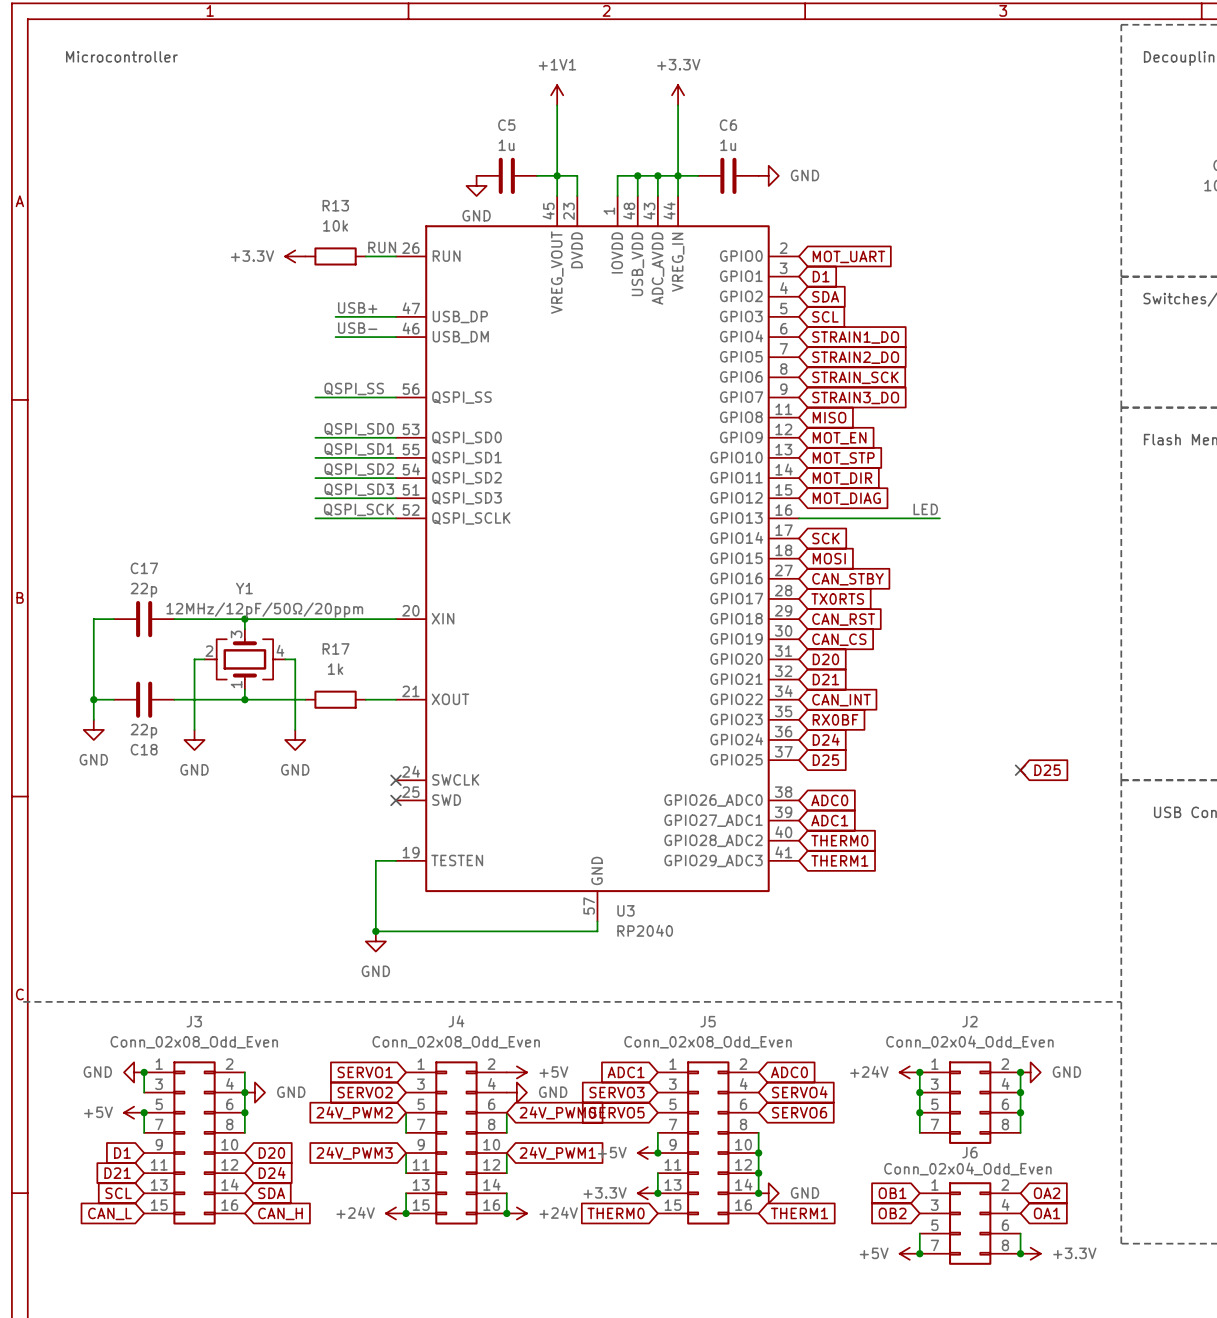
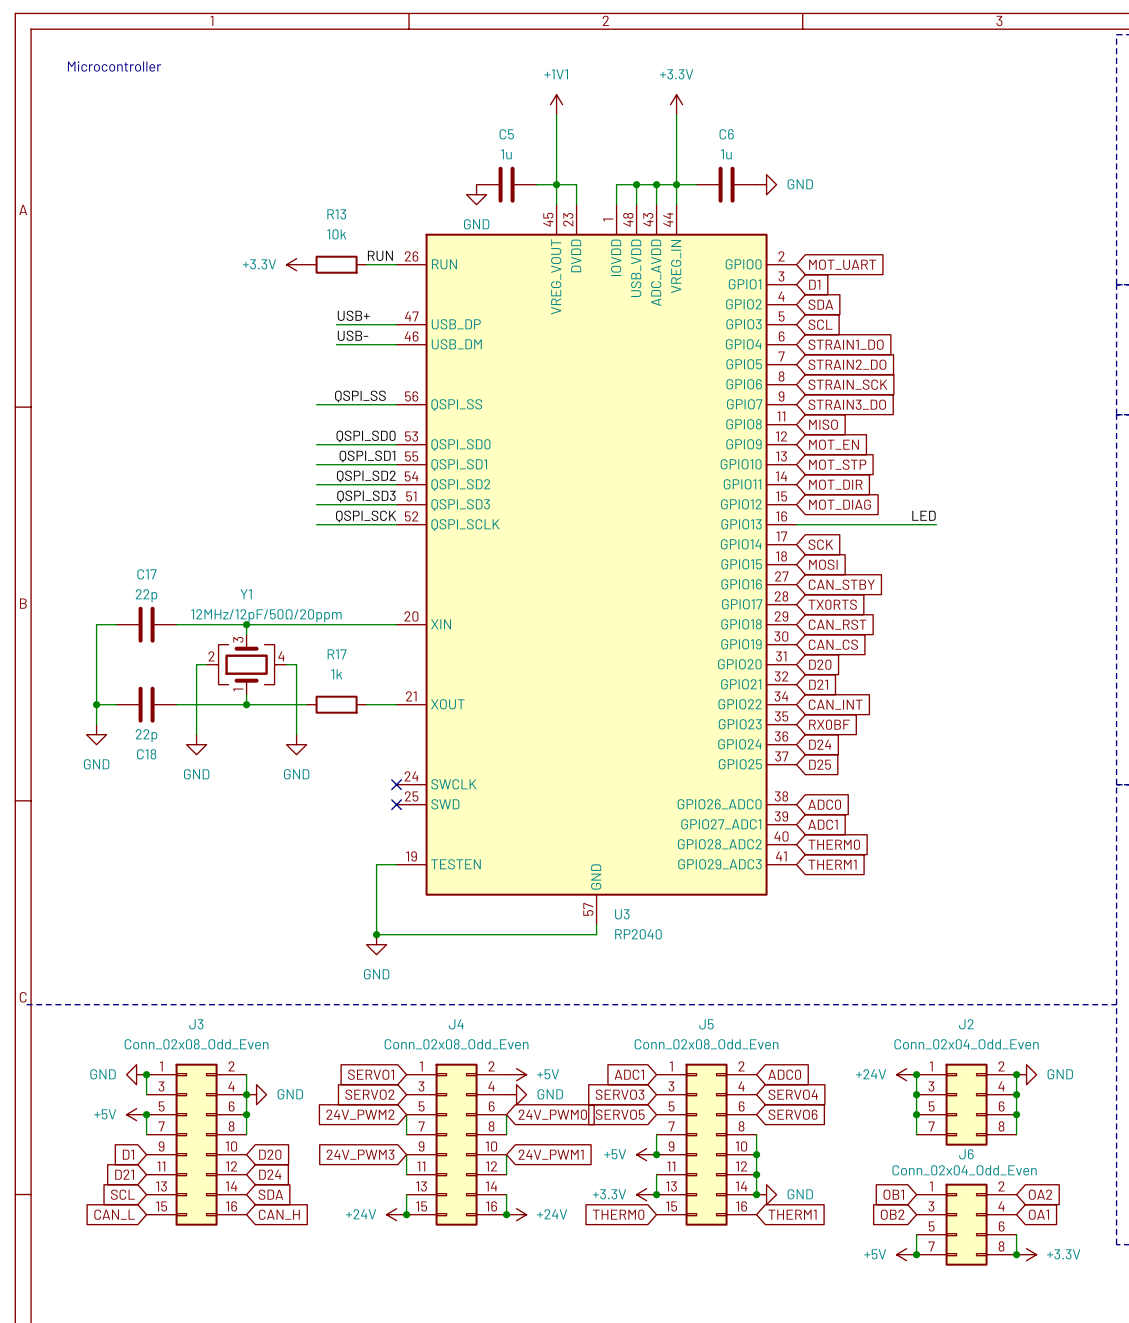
no-connect mark: (1020, 770) -> none
global label: D25 (1047, 770) -> none

